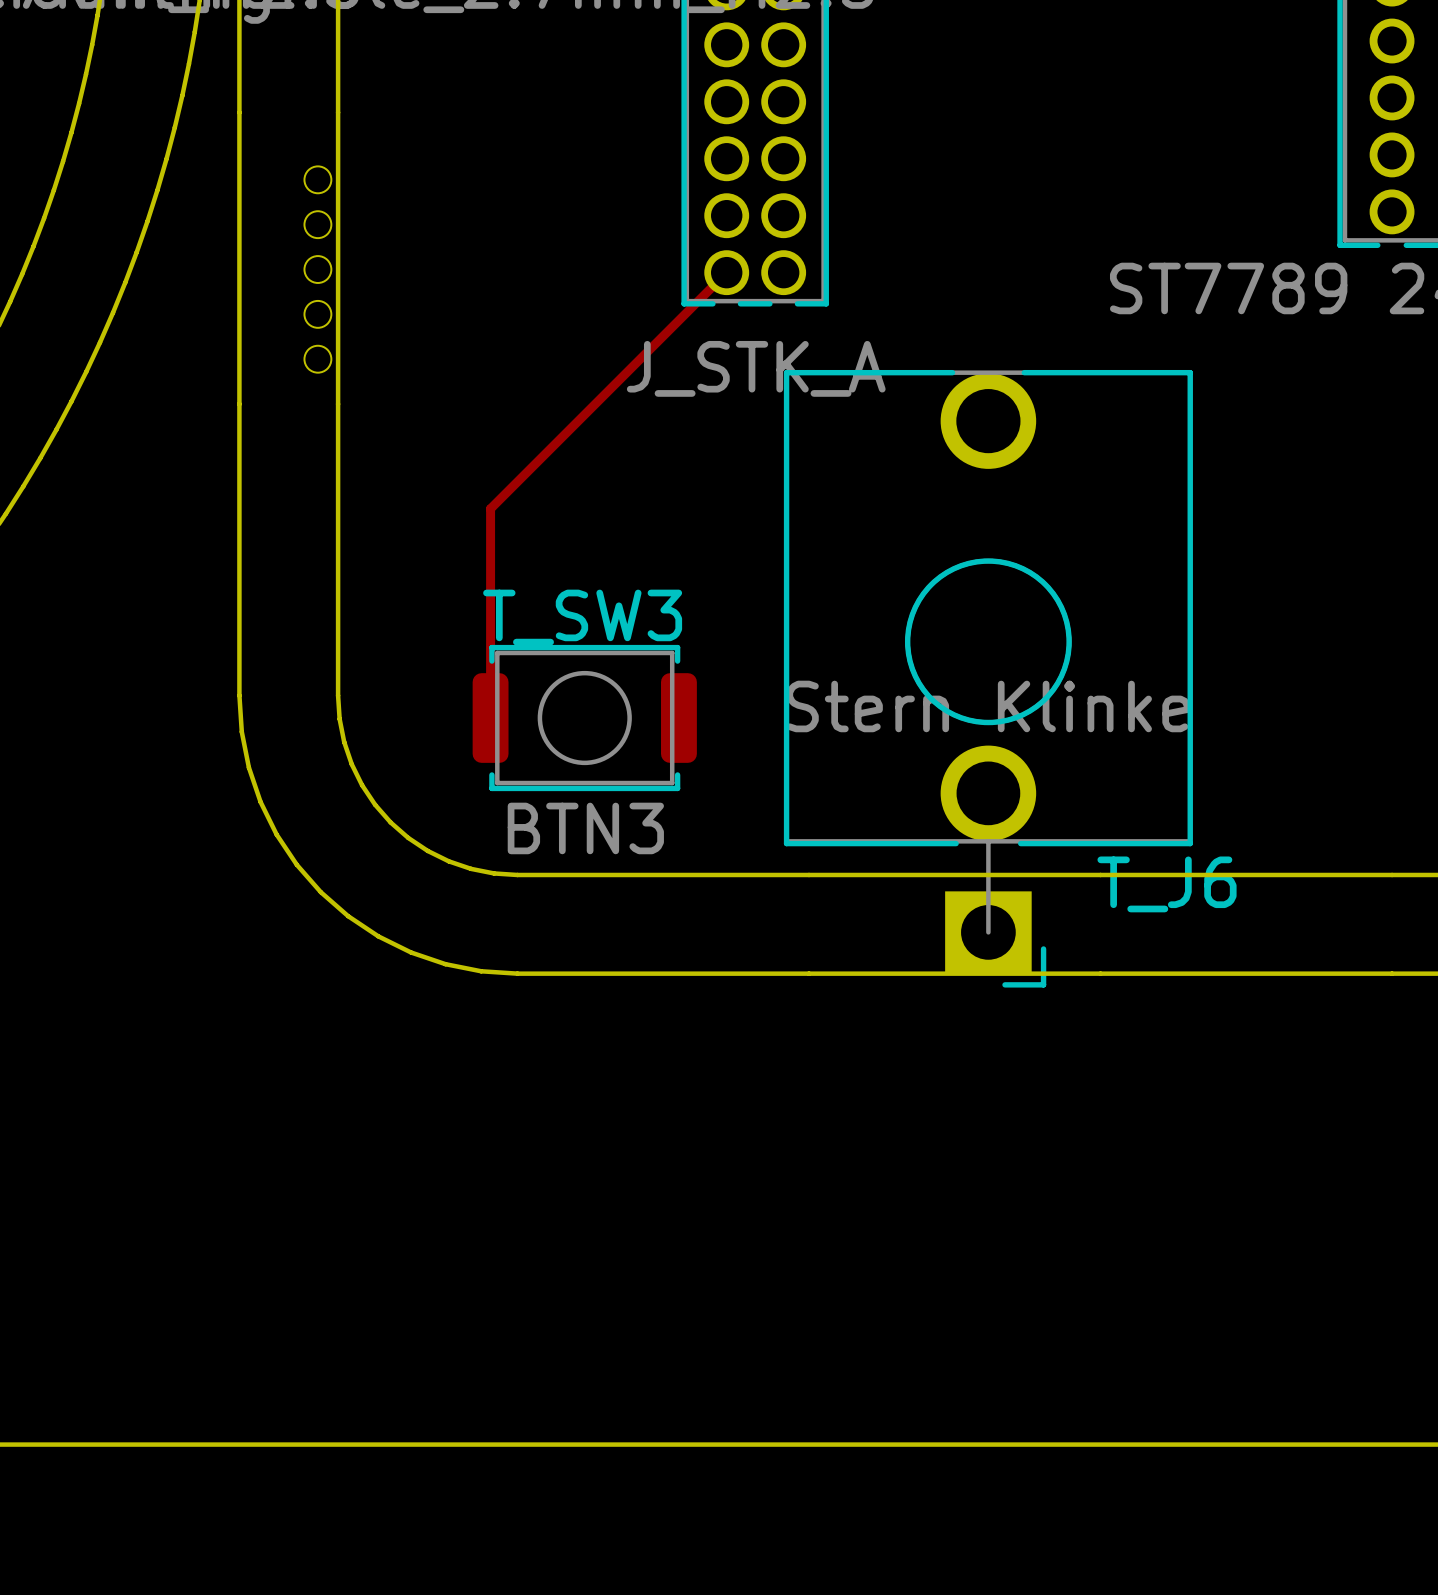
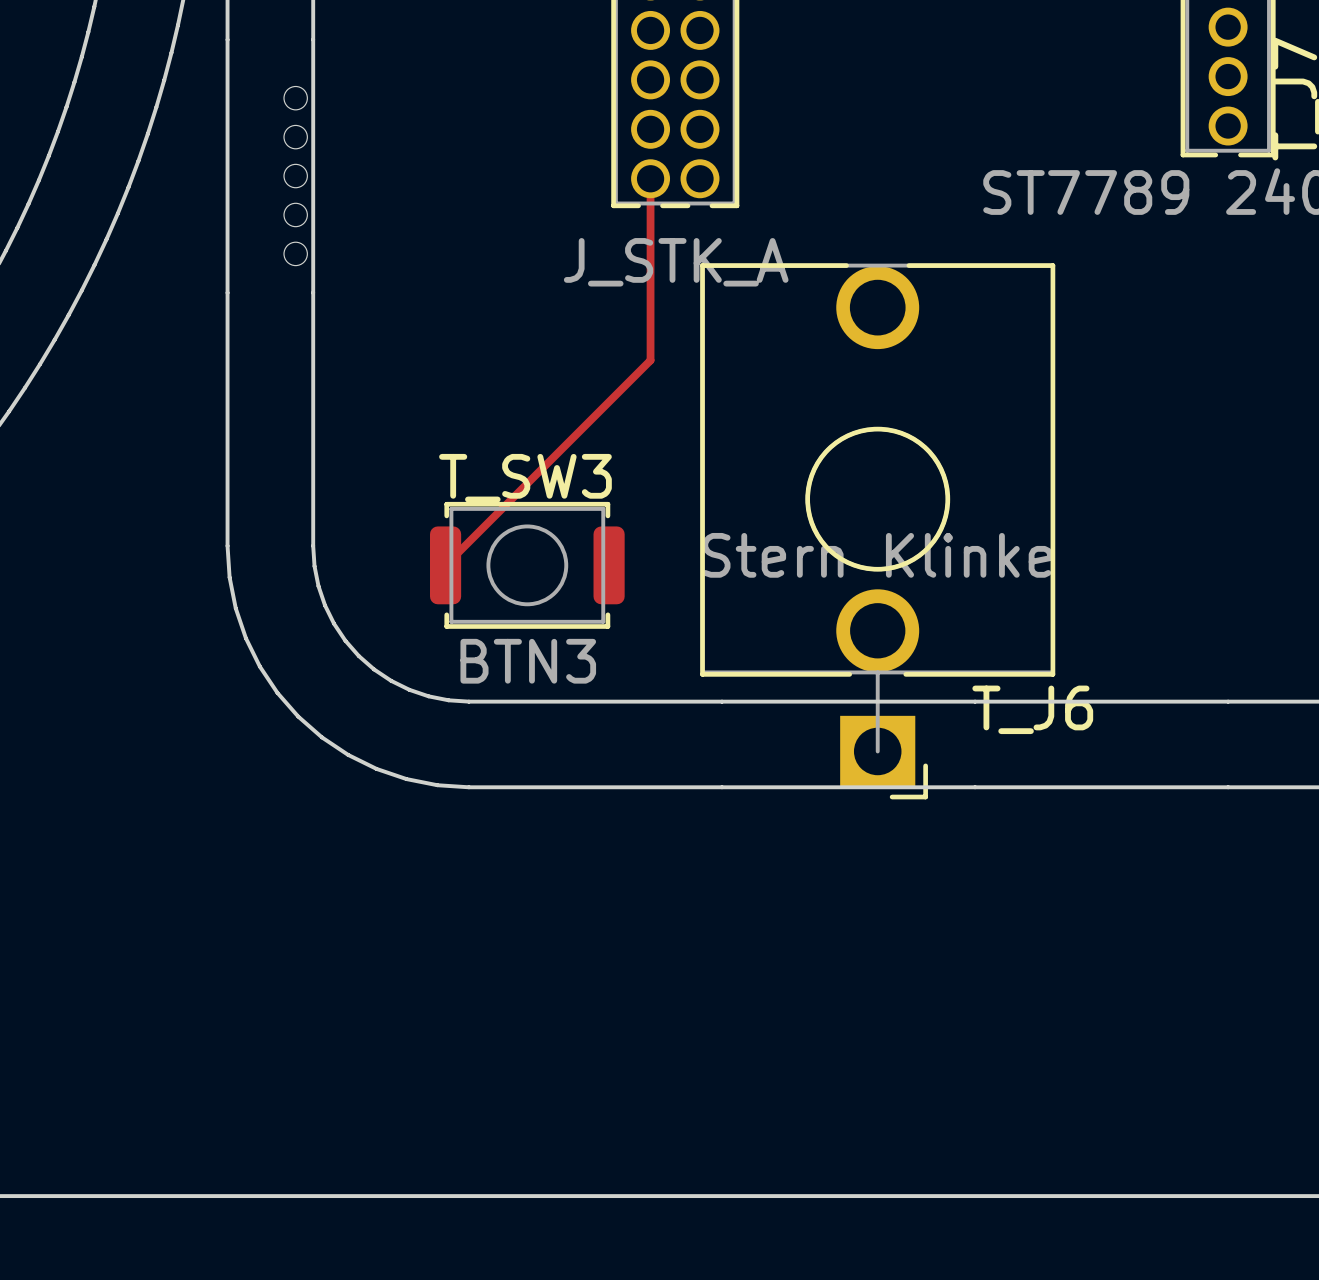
top track: (726, 272) (490, 508) (490, 718) -> (650, 178) (650, 360) (445, 565)

